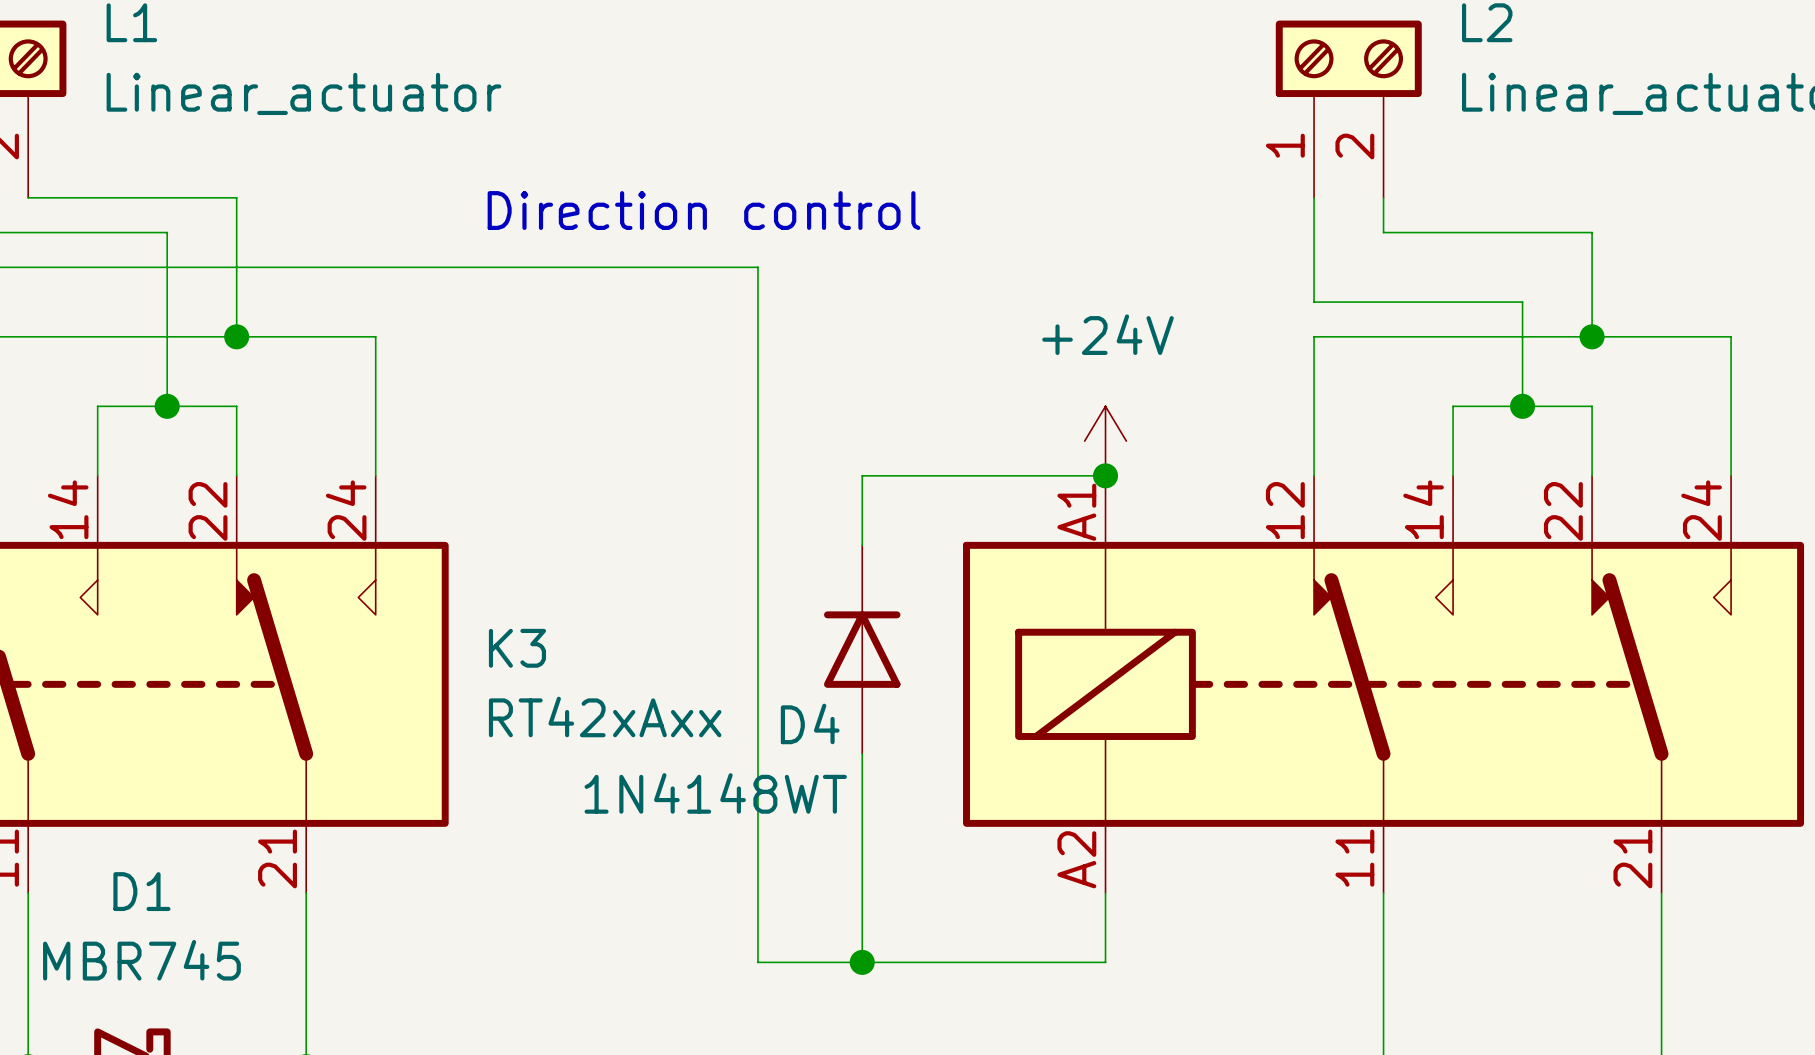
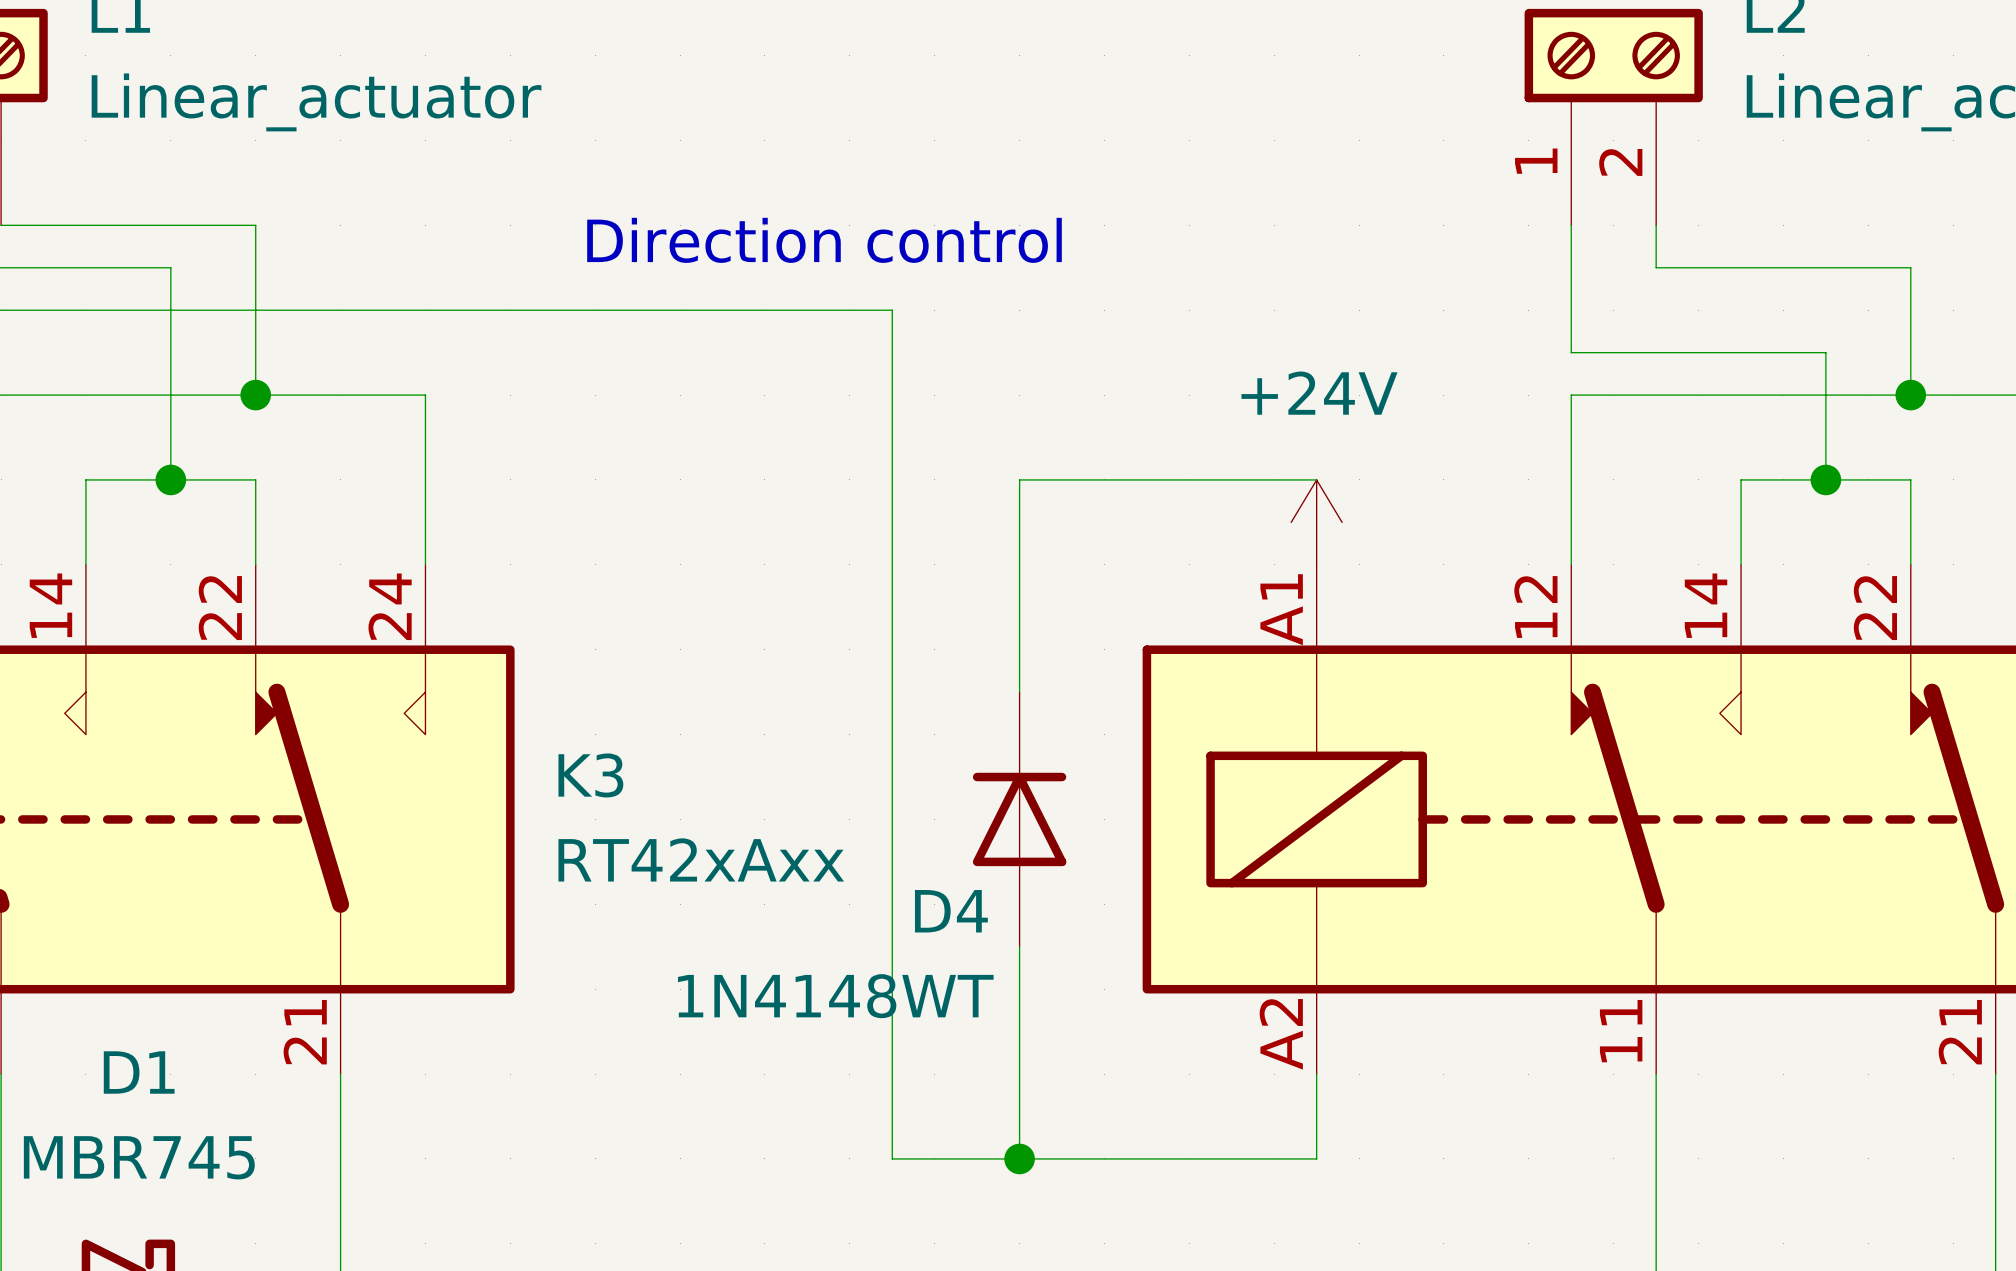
wire: (862, 475) (1105, 475) -> (1019, 564) (1019, 479) (1316, 479)
junction: (1105, 475) -> none
D4 position: (862, 649) -> (1019, 819)

